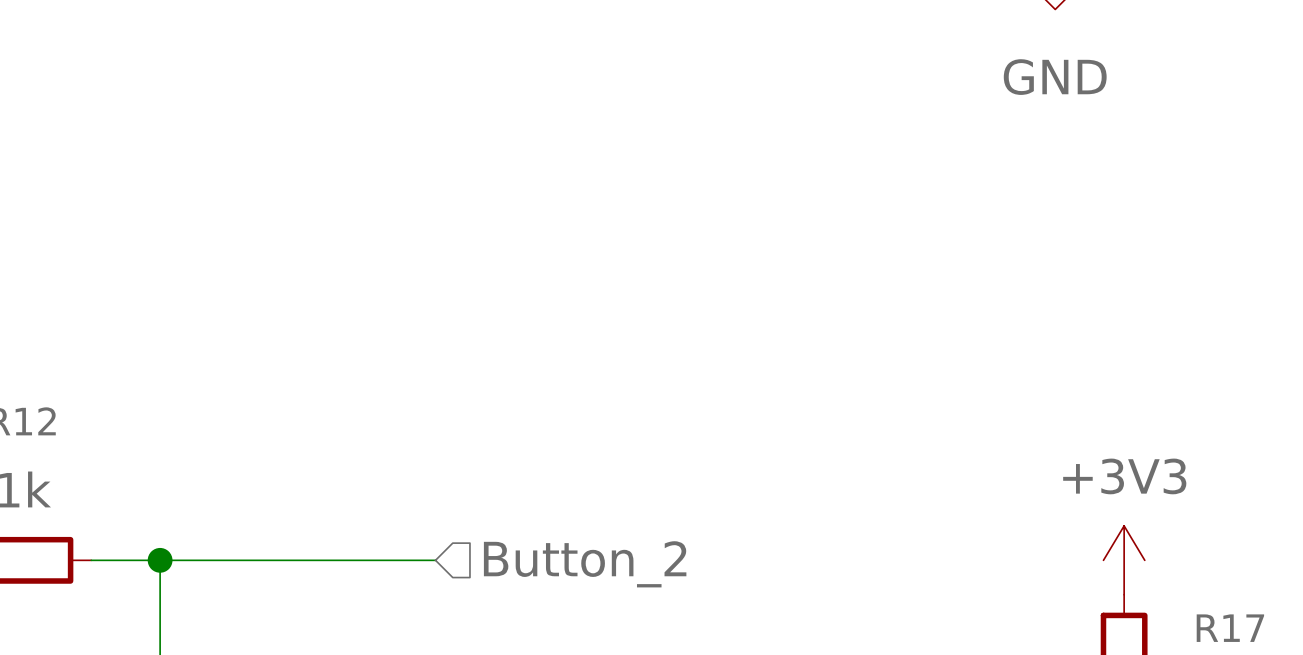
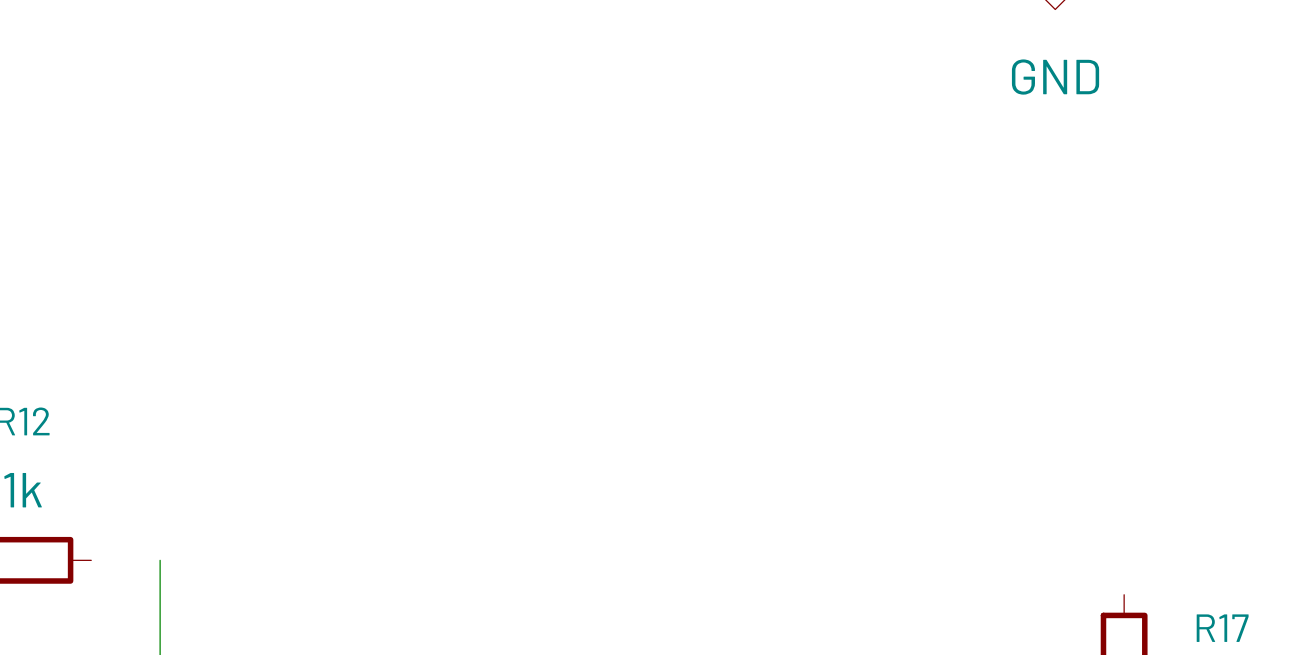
wire: (91, 560) (435, 560) -> none
junction: (160, 560) -> none
power symbol: +3V3 (1124, 560) -> none
hierarchical label: Button_2 (585, 564) -> none

